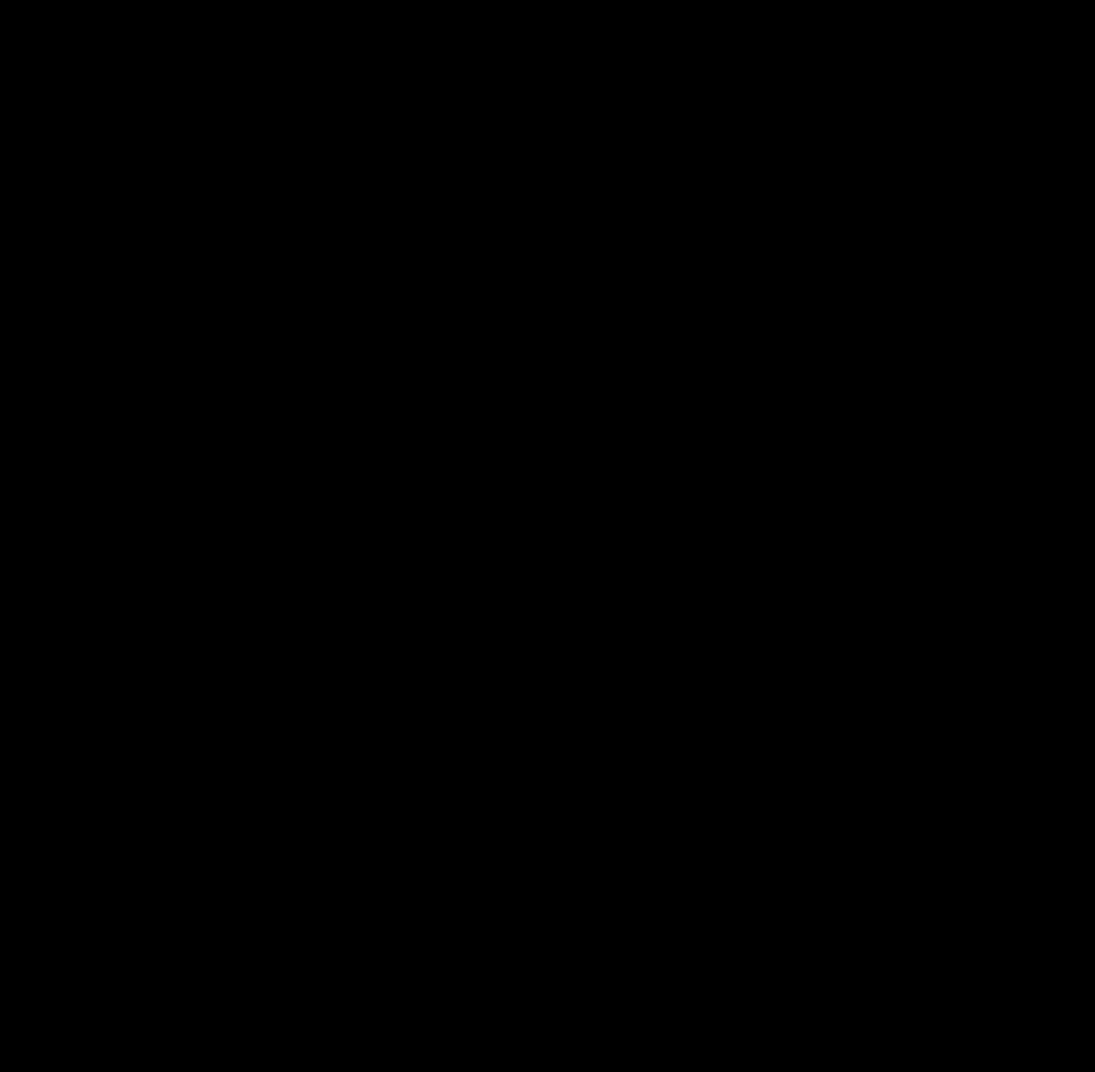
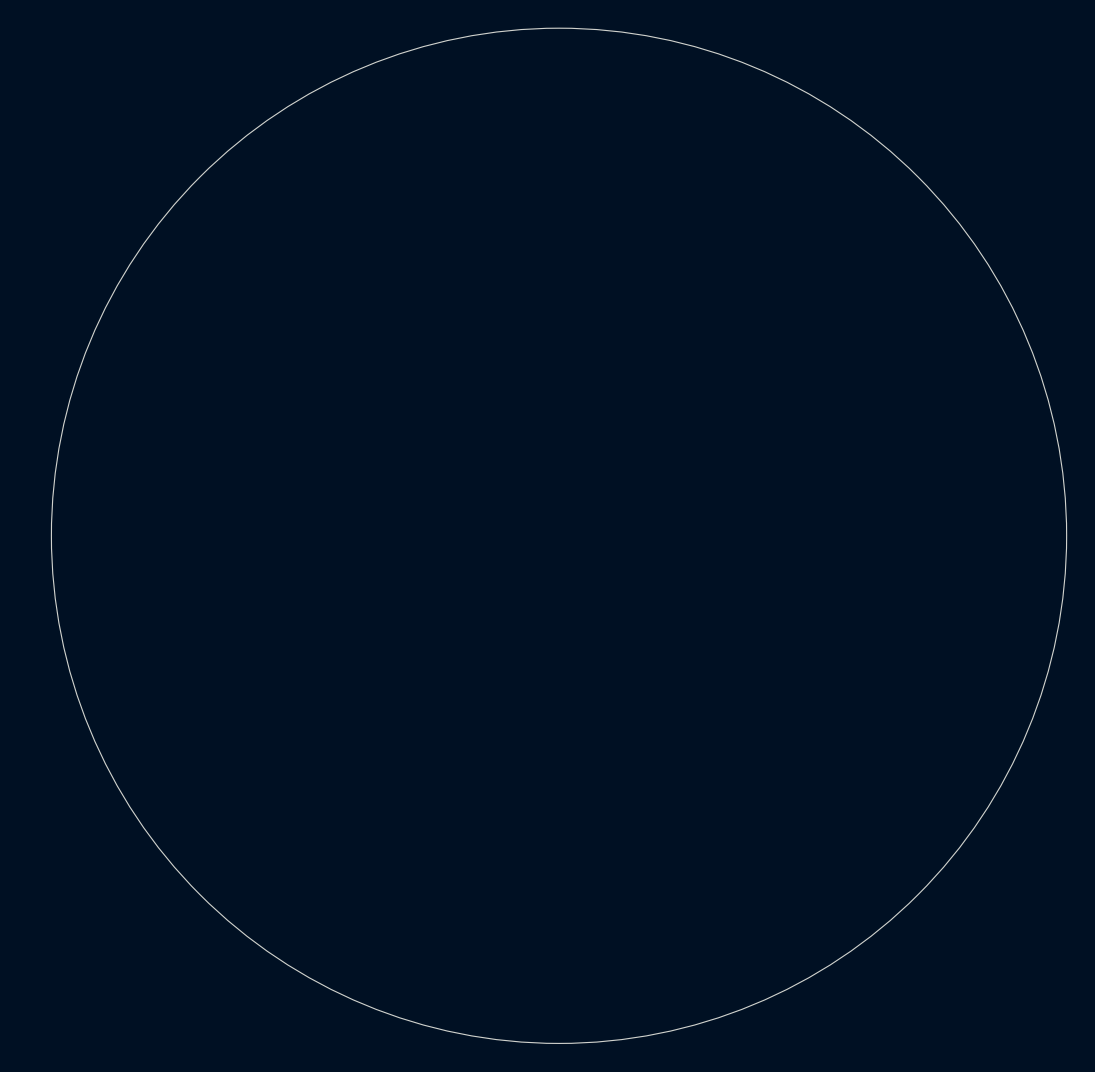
round board edge: none -> [51, 27, 1067, 1044]

